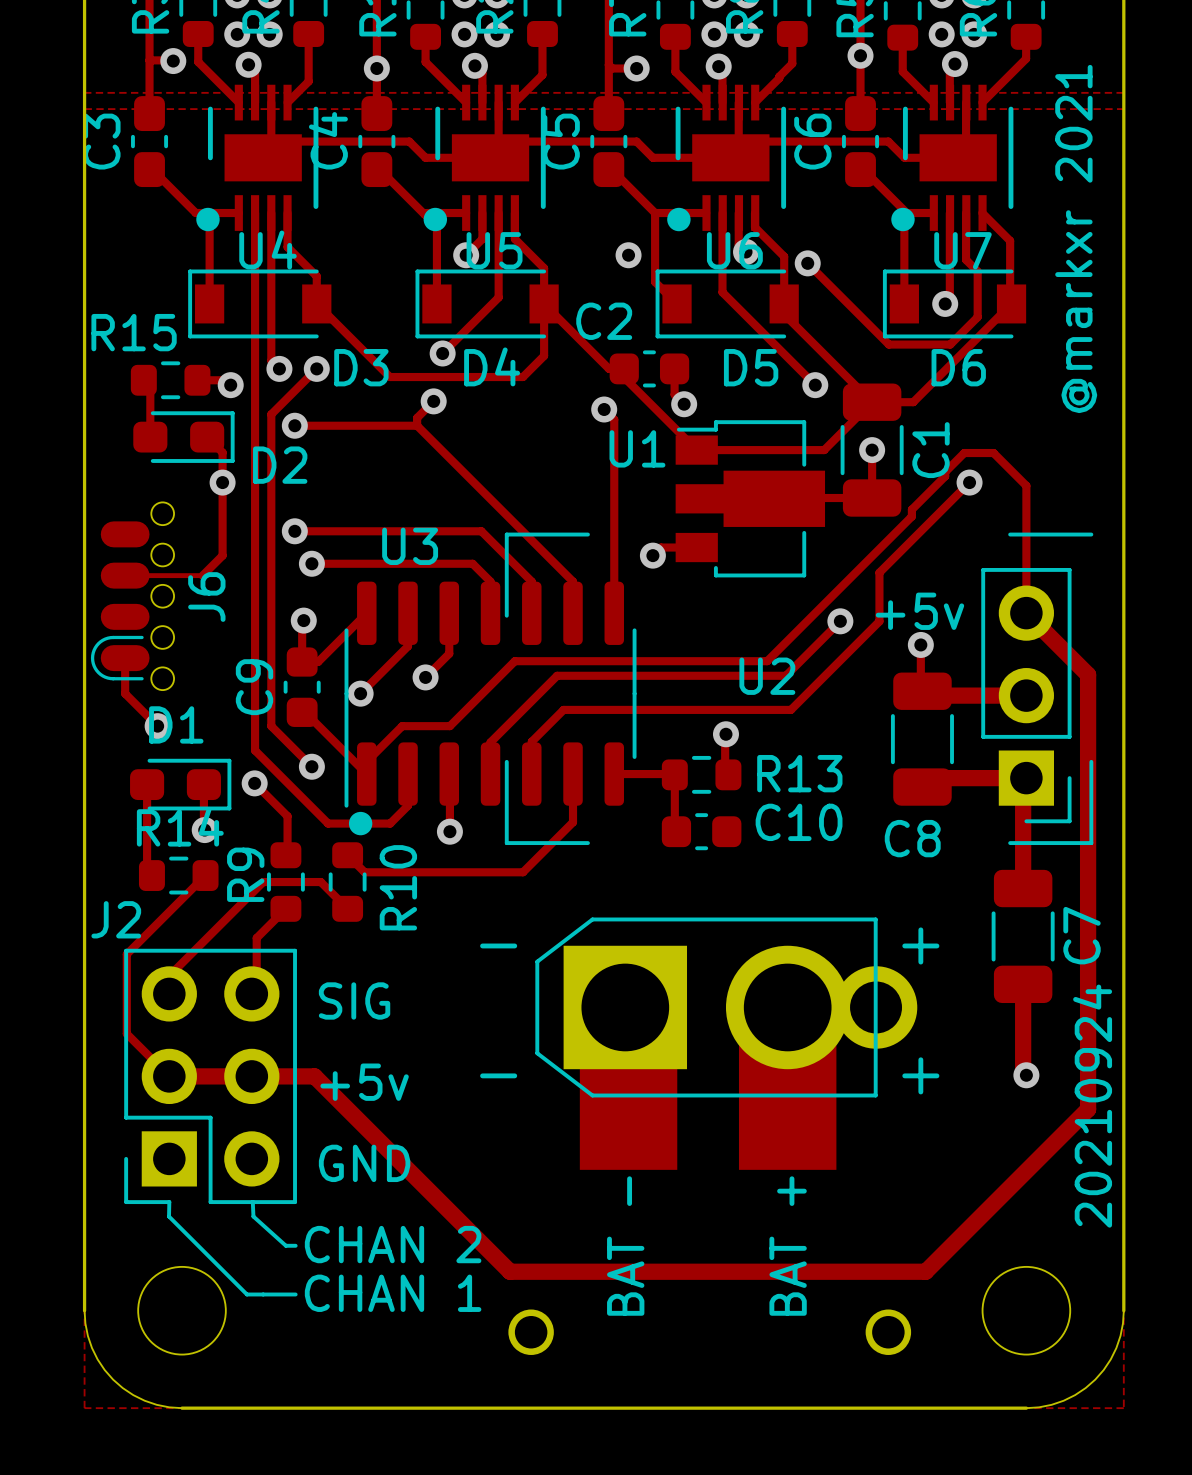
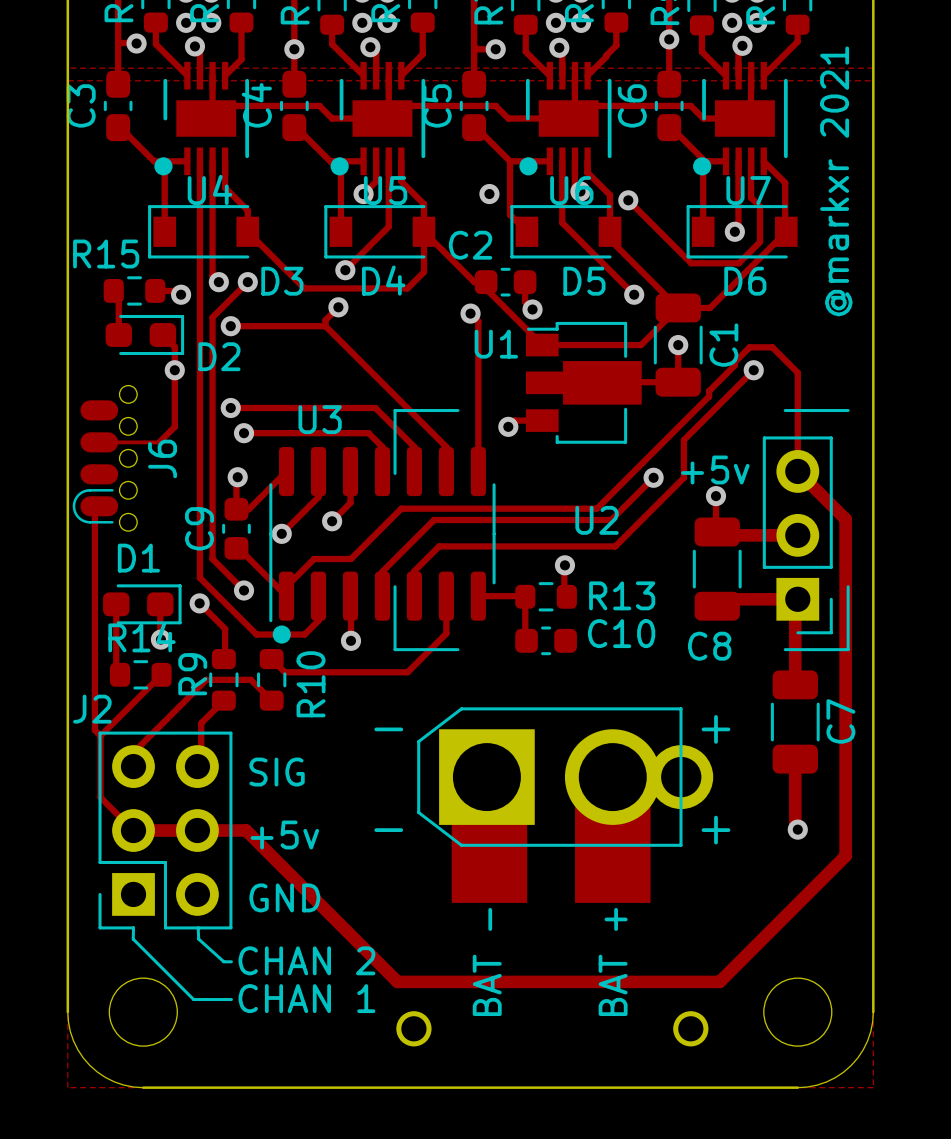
track: (125, 658) (125, 693) (157, 726) -> (99, 506) (94, 510) (94, 730) (100, 735)
via: (157, 726) -> none
text: 20210924 (1092, 1106) -> none

